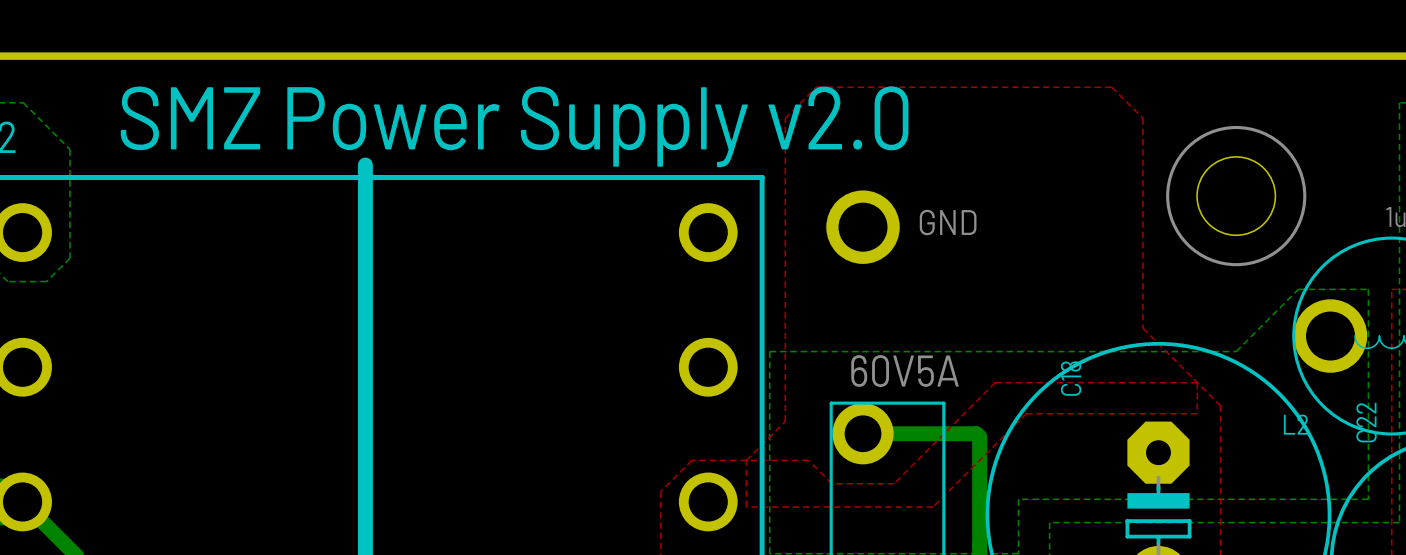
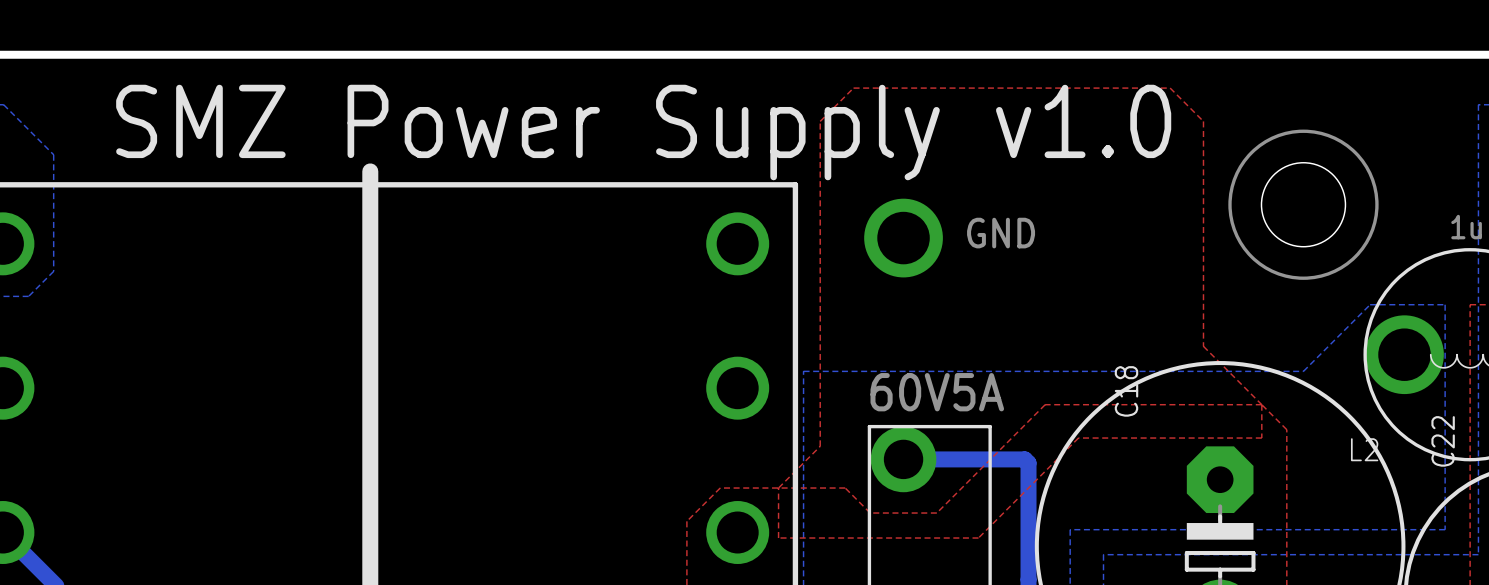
text: SMZ Power Supply v2.0 (514, 126) -> SMZ Power Supply v1.0 (643, 132)

